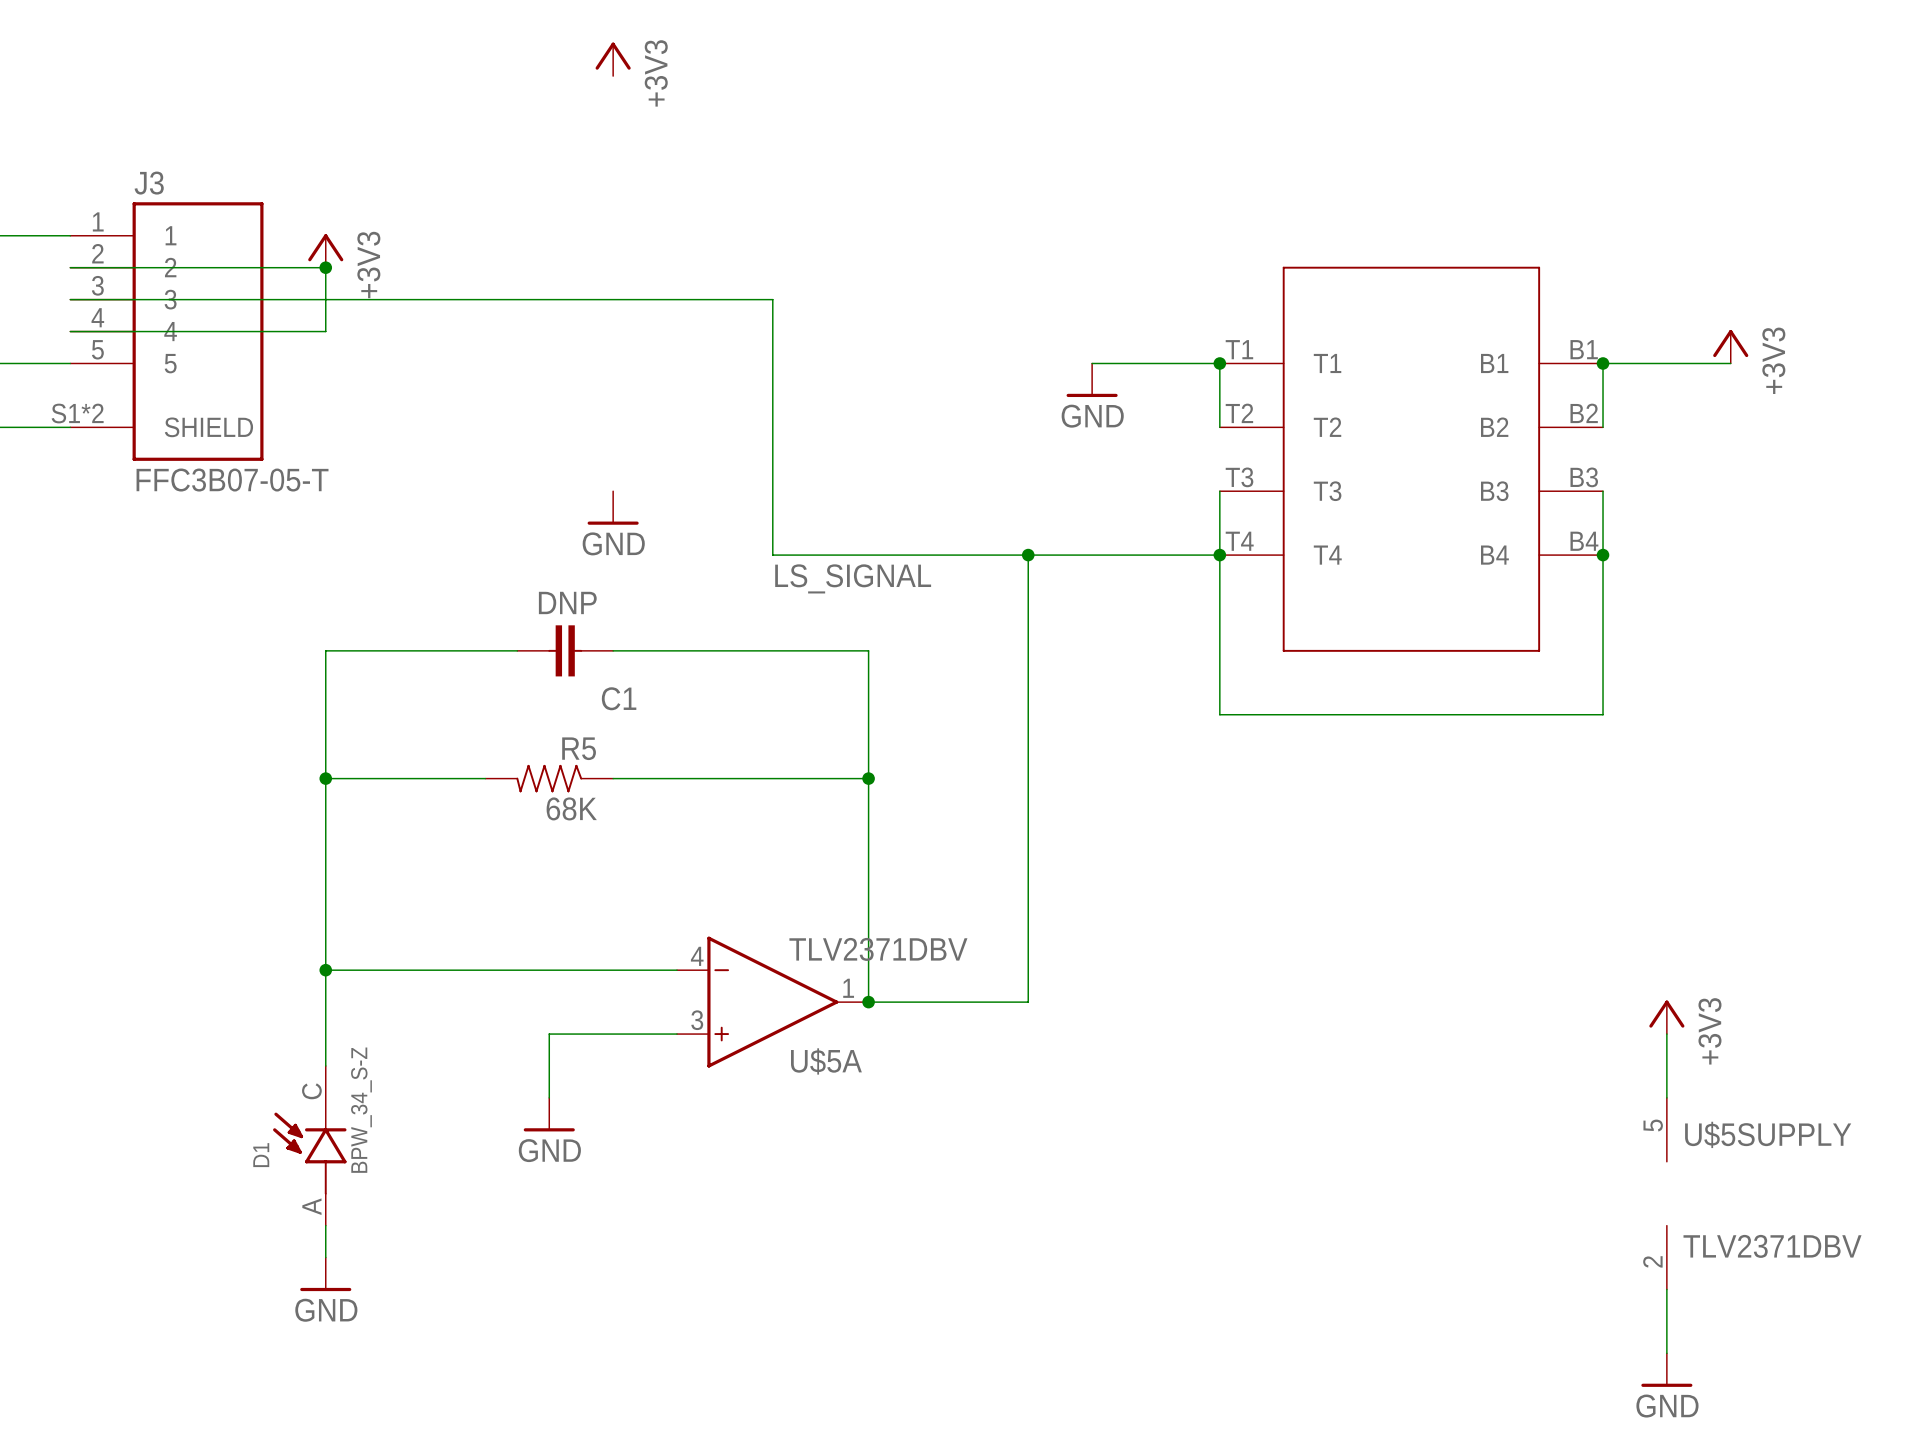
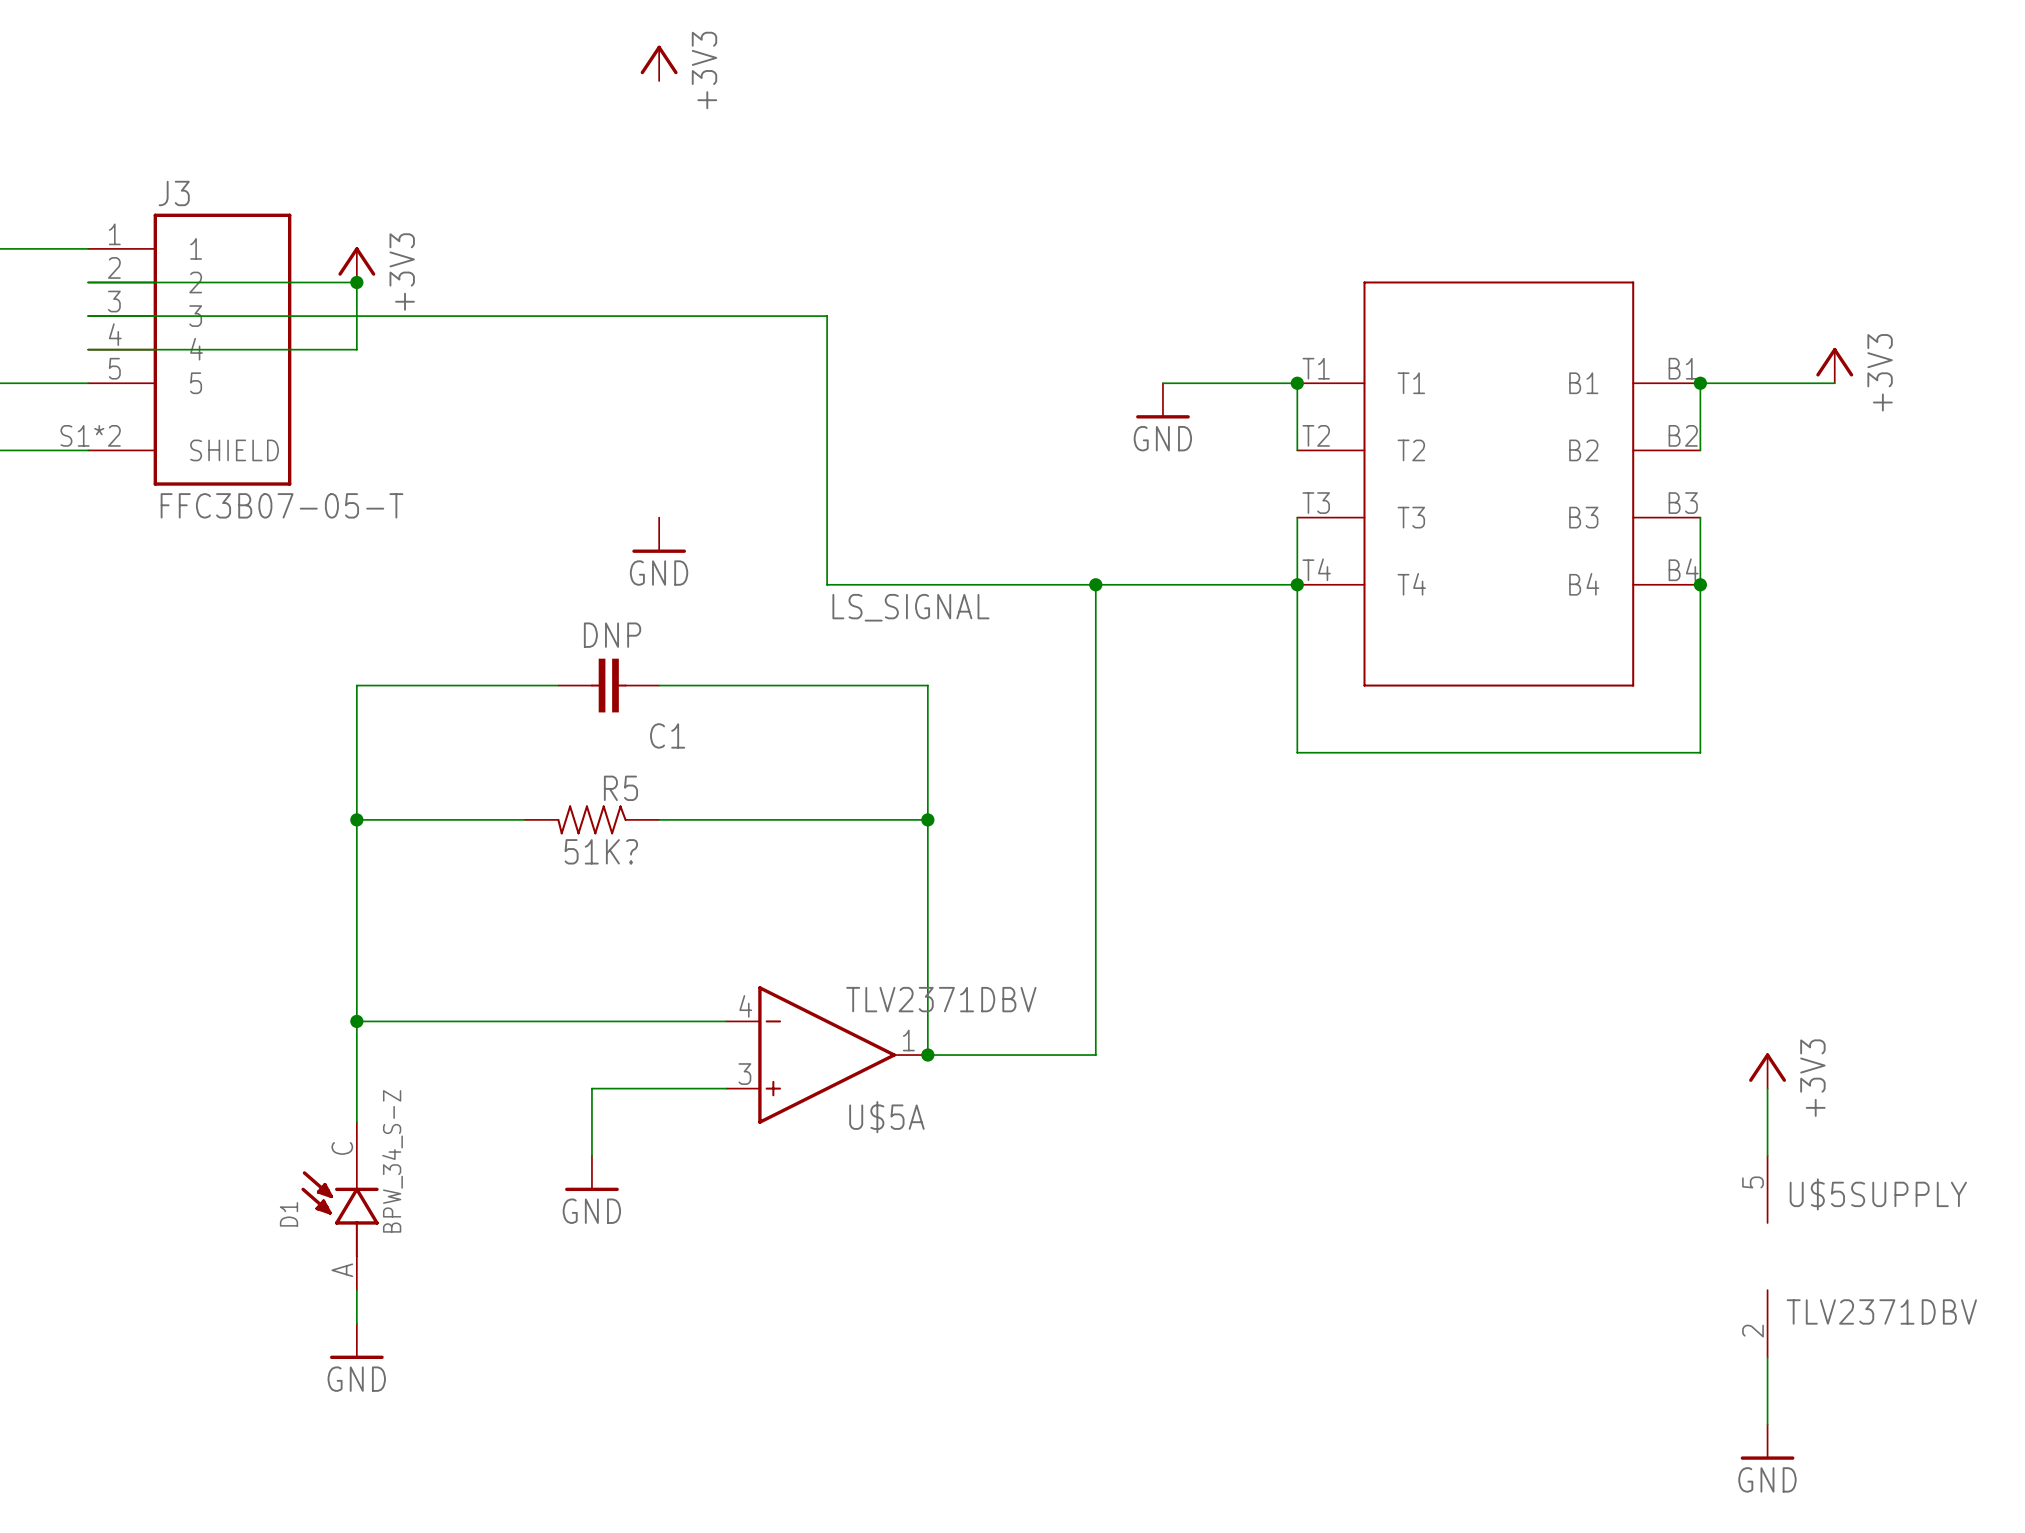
R5 value: 68K (571, 808) -> 51K? (601, 851)

